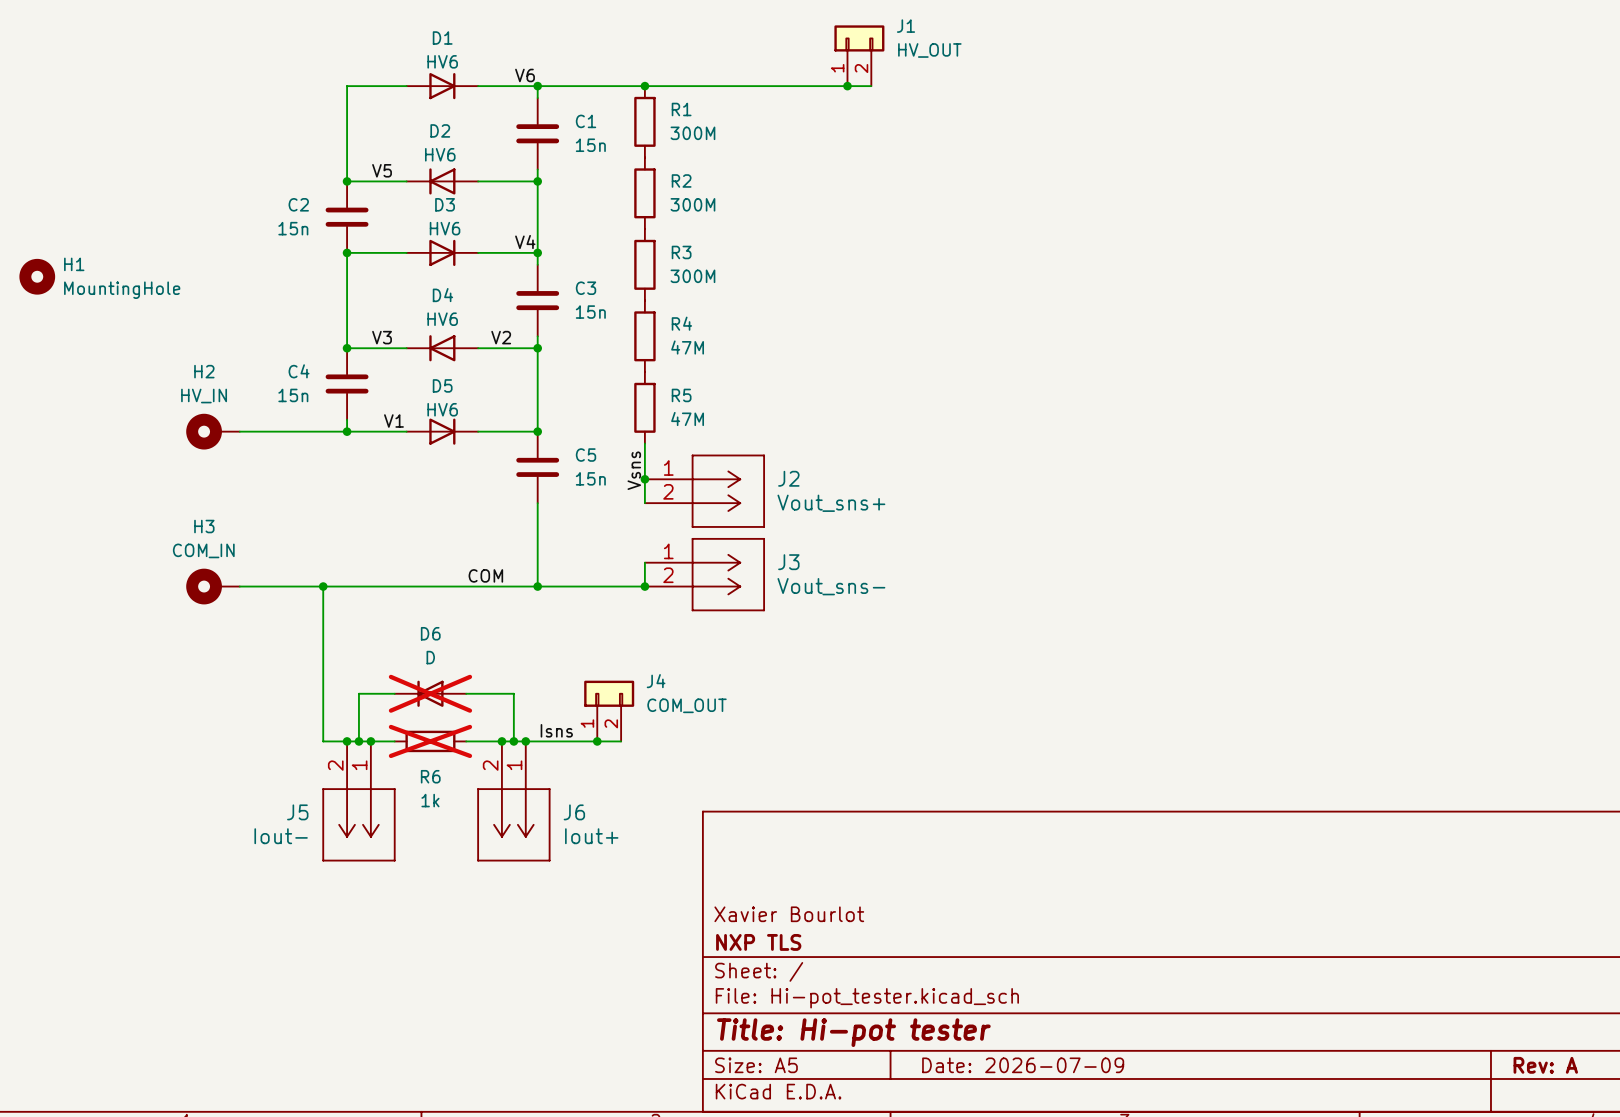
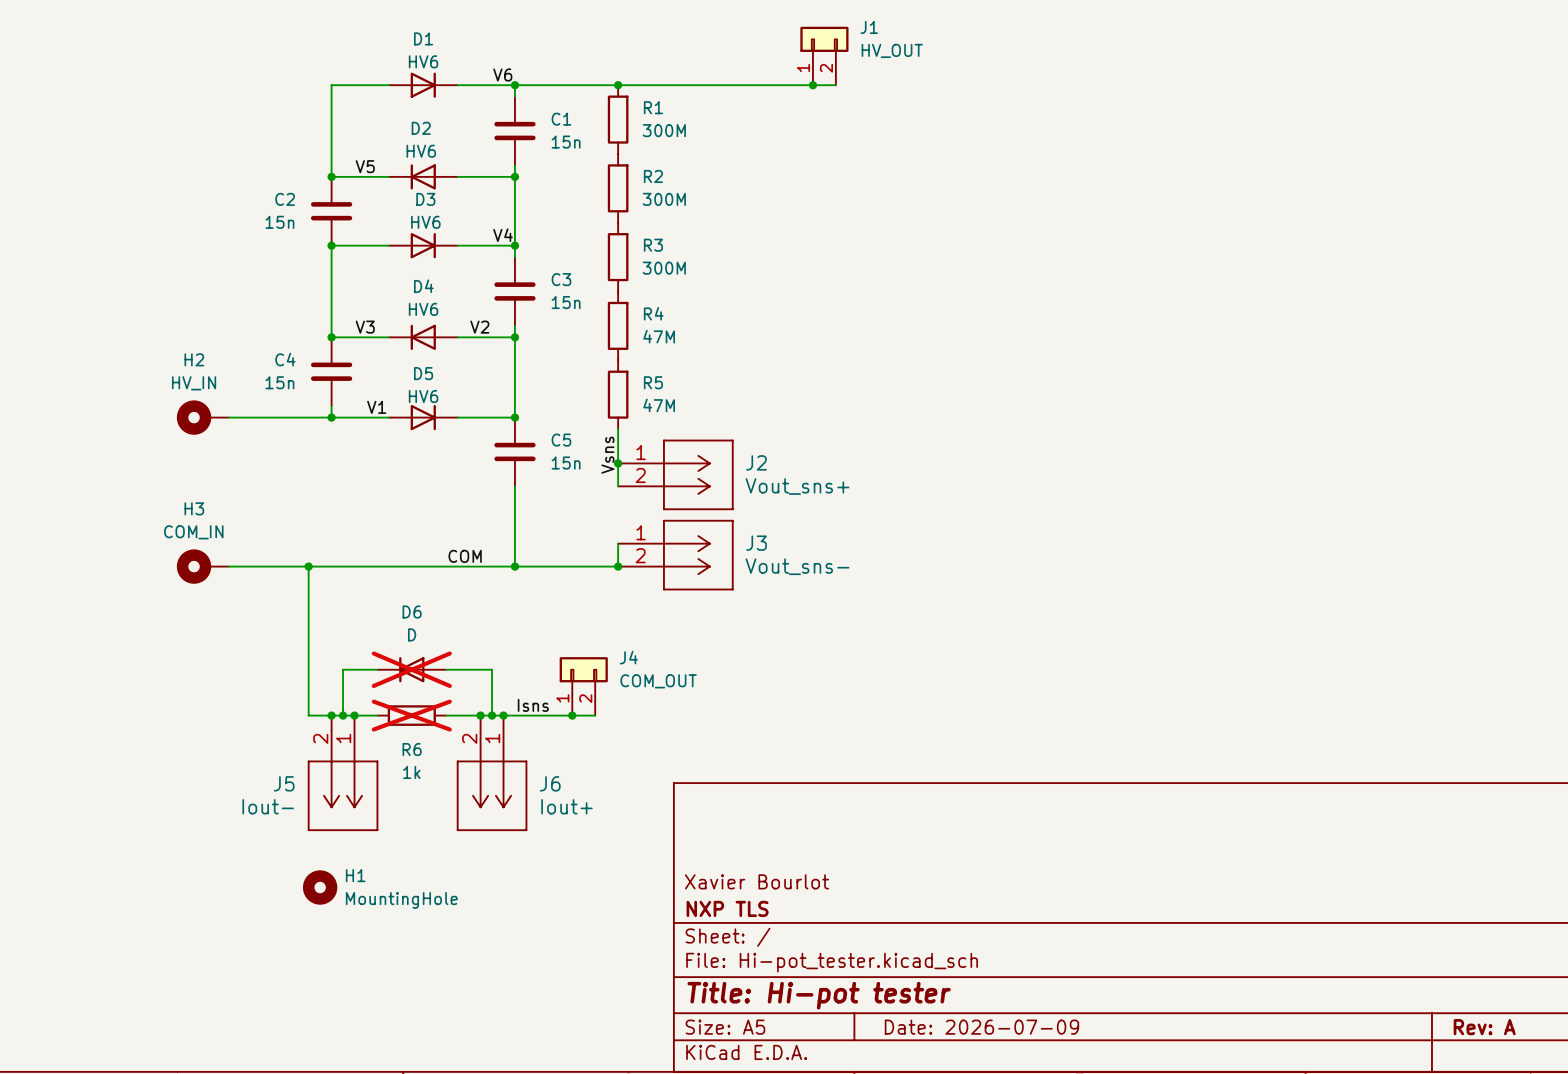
H1 position: (37, 276) -> (320, 887)

